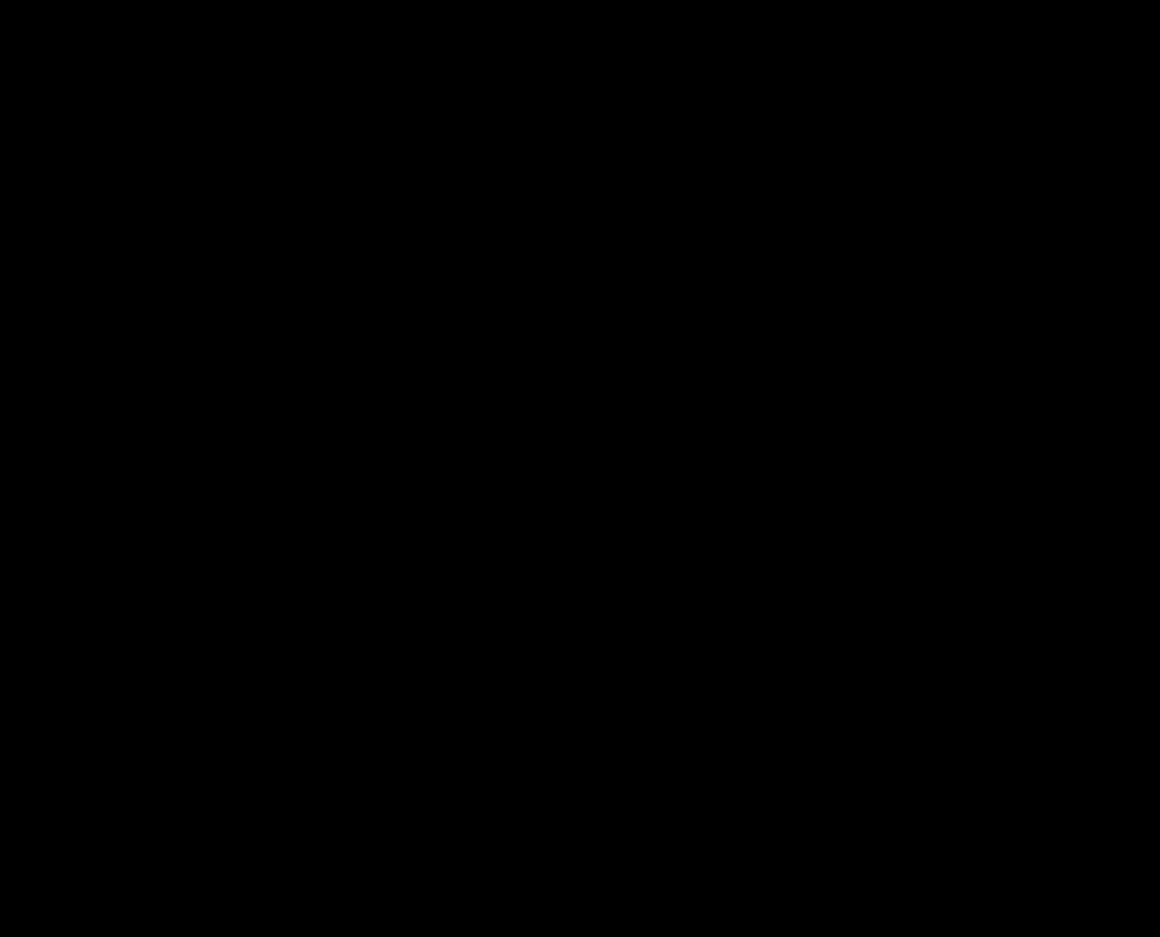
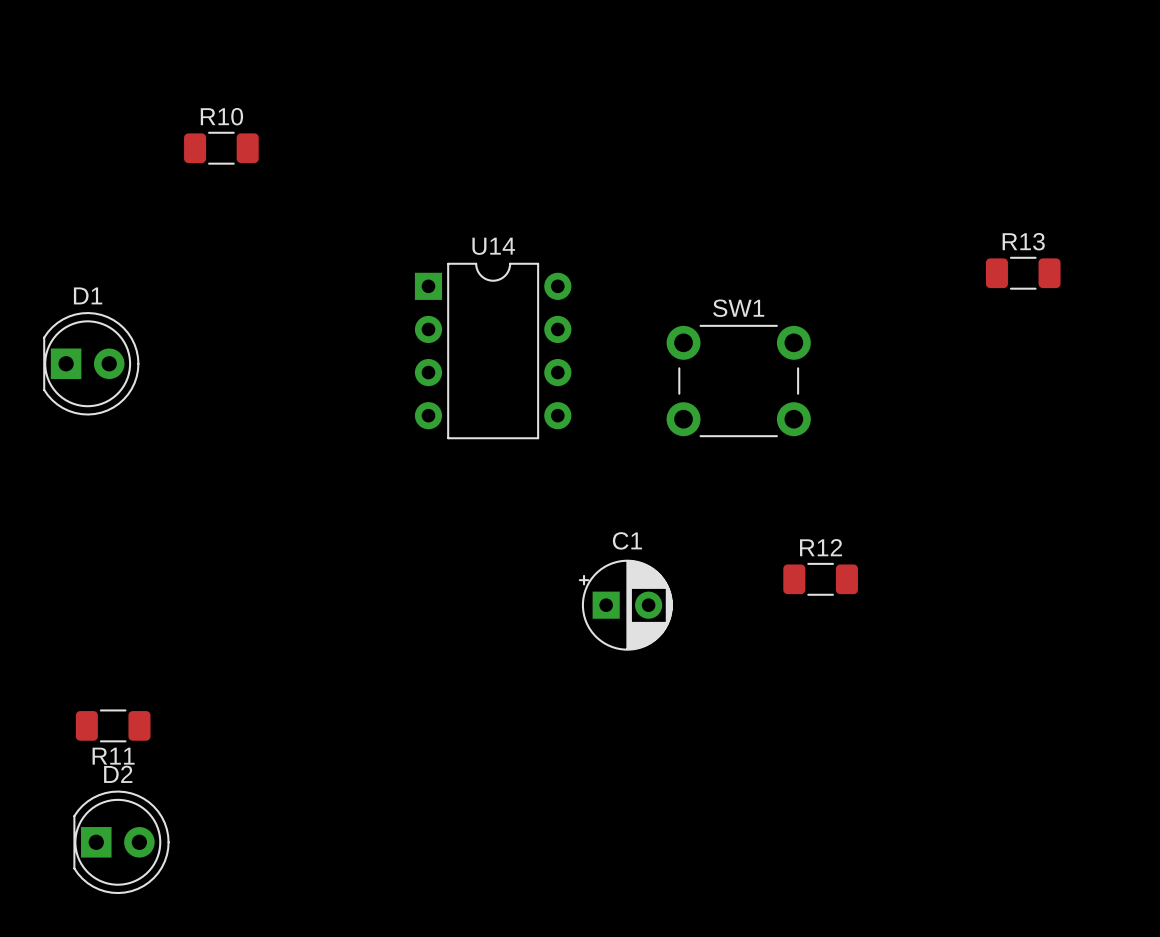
R10: none -> (221, 148)
R13: none -> (1023, 273)
U14: none -> (493, 351)
D1: none -> (91, 363)
SW1: none -> (738, 381)
R12: none -> (820, 579)
C1: none -> (625, 605)
R11: none -> (113, 725)
D2: none -> (121, 842)

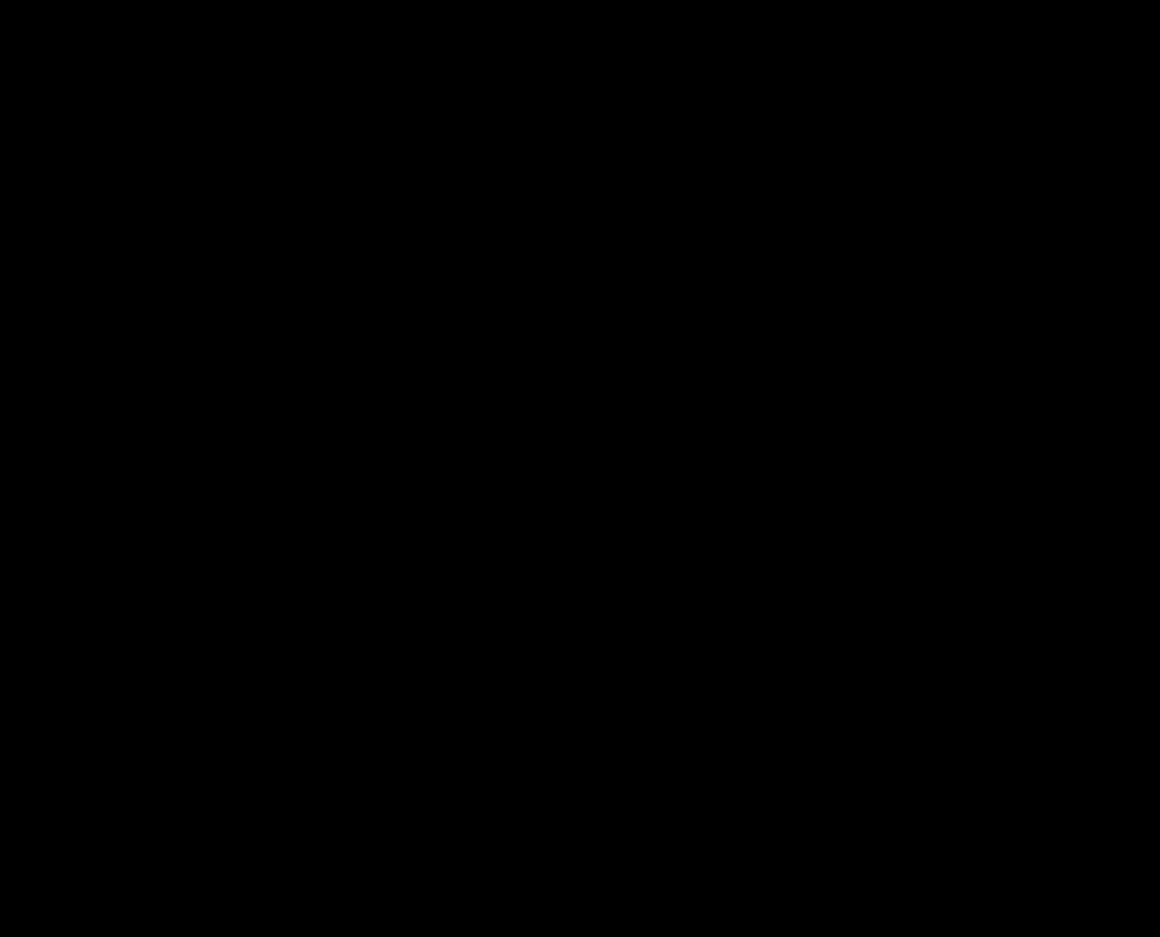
R10: (221, 148) -> none
R13: (1023, 273) -> none
U14: (493, 351) -> none
D1: (91, 363) -> none
SW1: (738, 381) -> none
R12: (820, 579) -> none
C1: (625, 605) -> none
R11: (113, 725) -> none
D2: (121, 842) -> none

